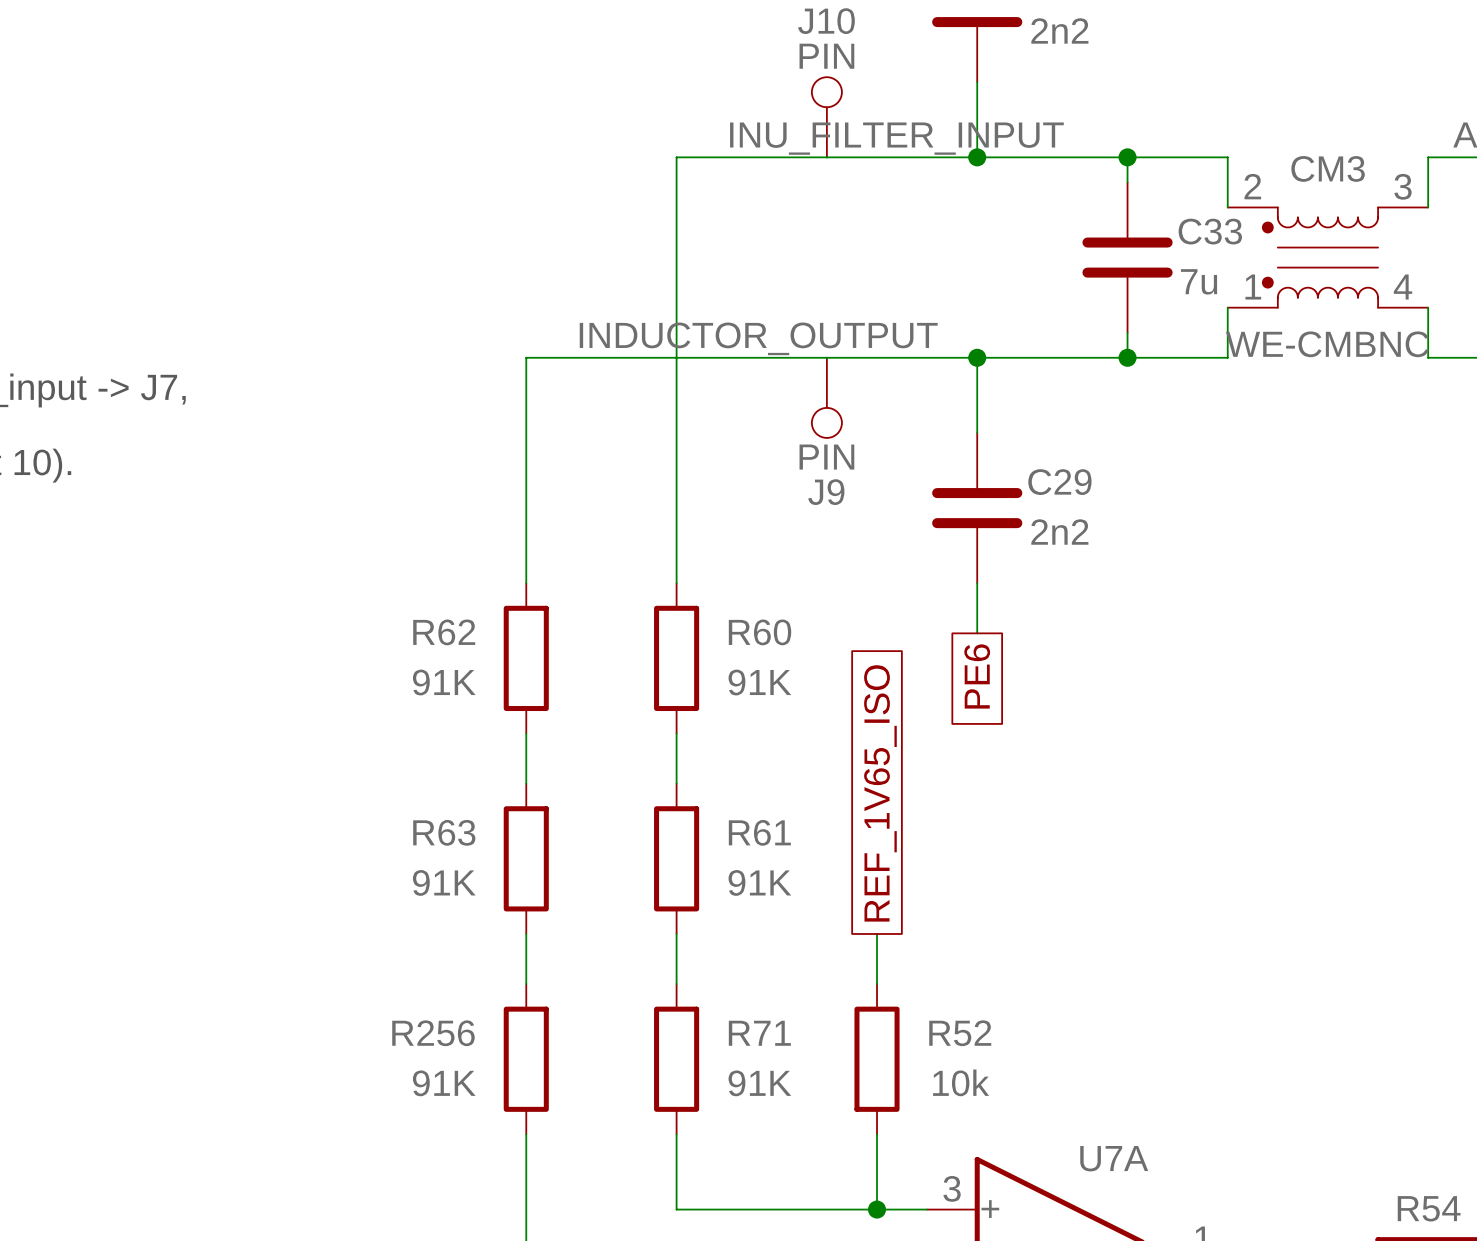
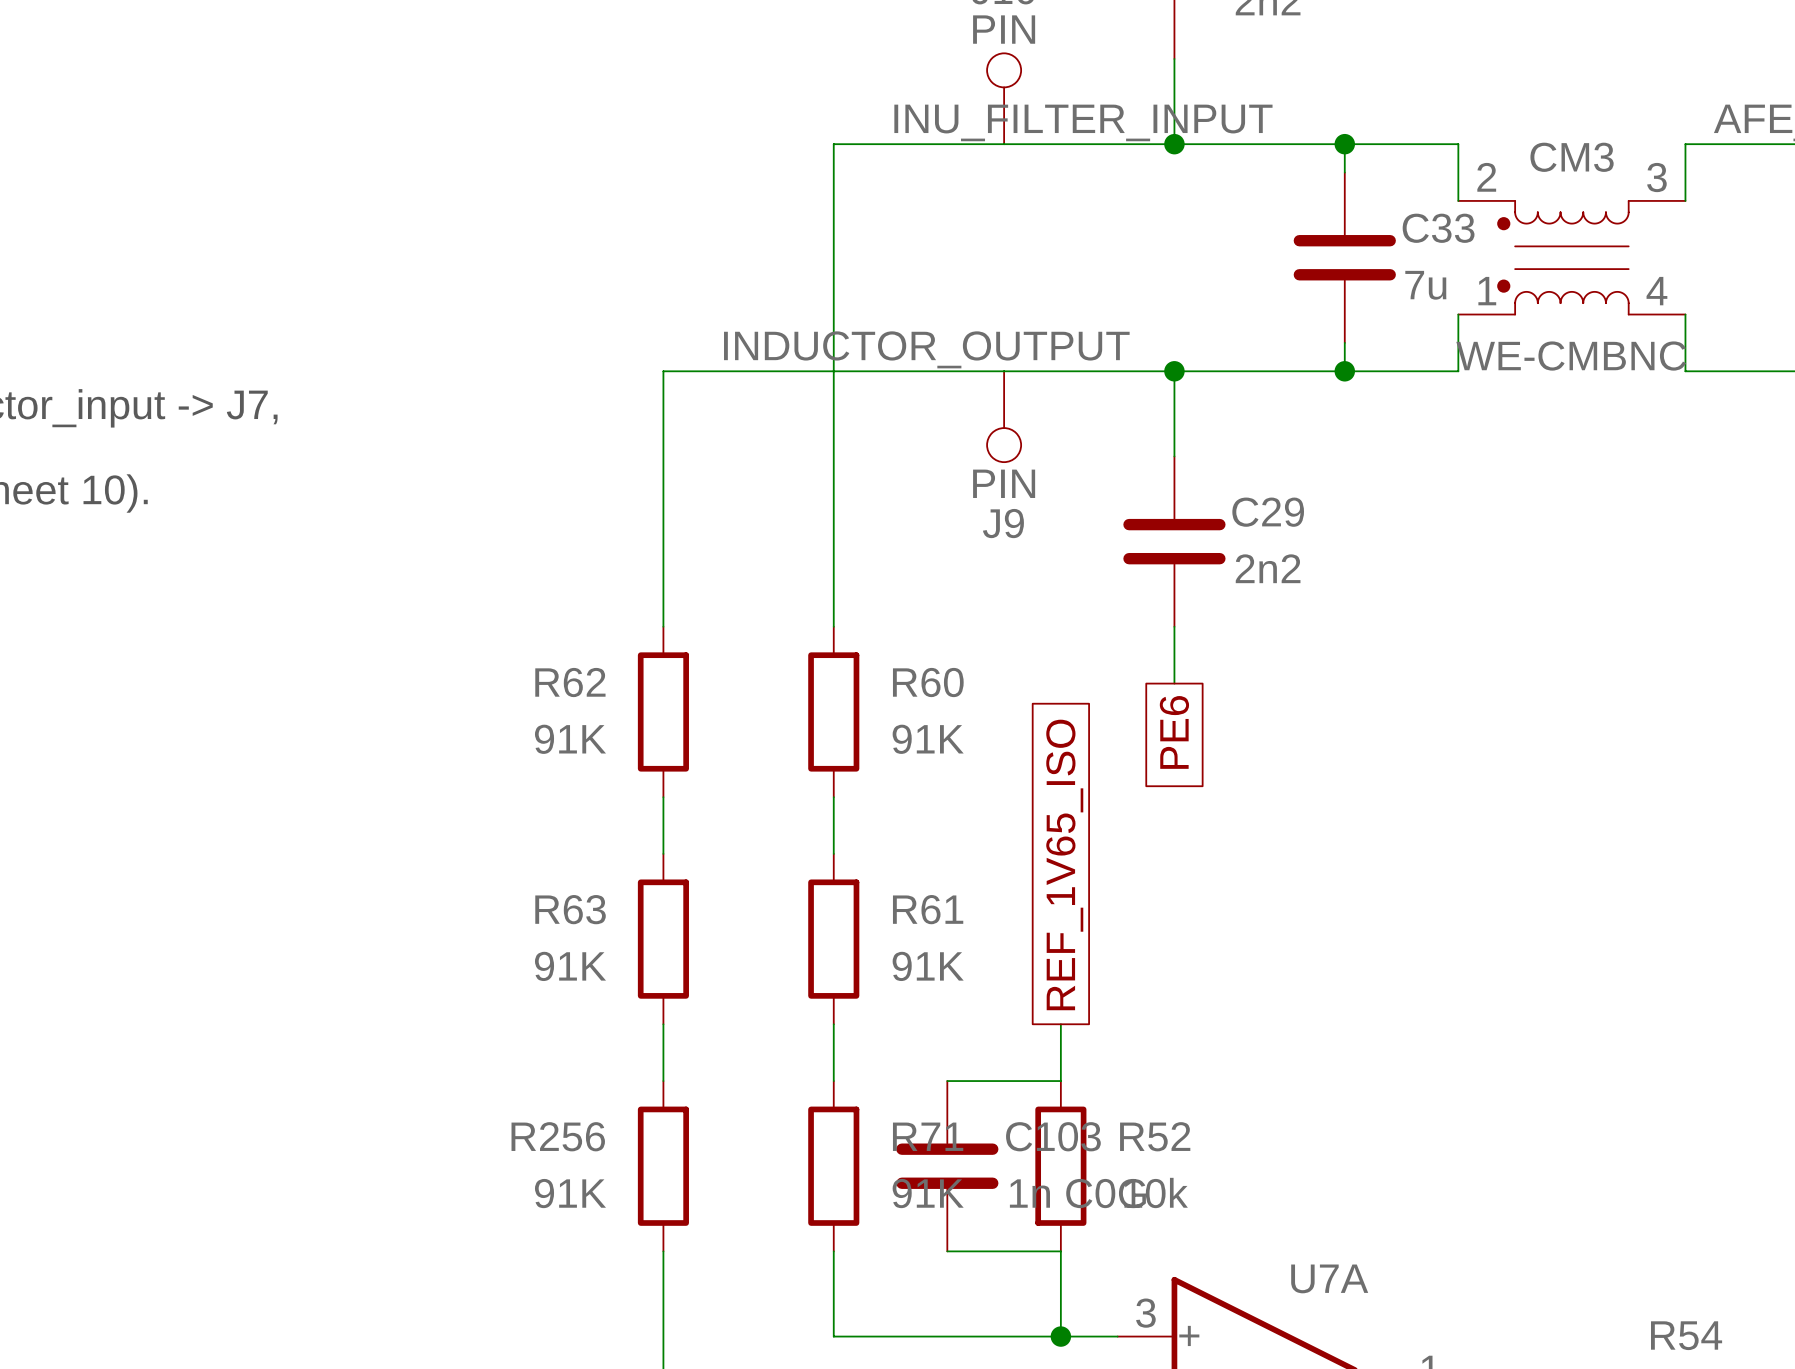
wire: none -> (947, 1081) (1060, 1081)
C103: none -> 1n C0G (947, 1166)
wire: none -> (947, 1251) (1060, 1251)

